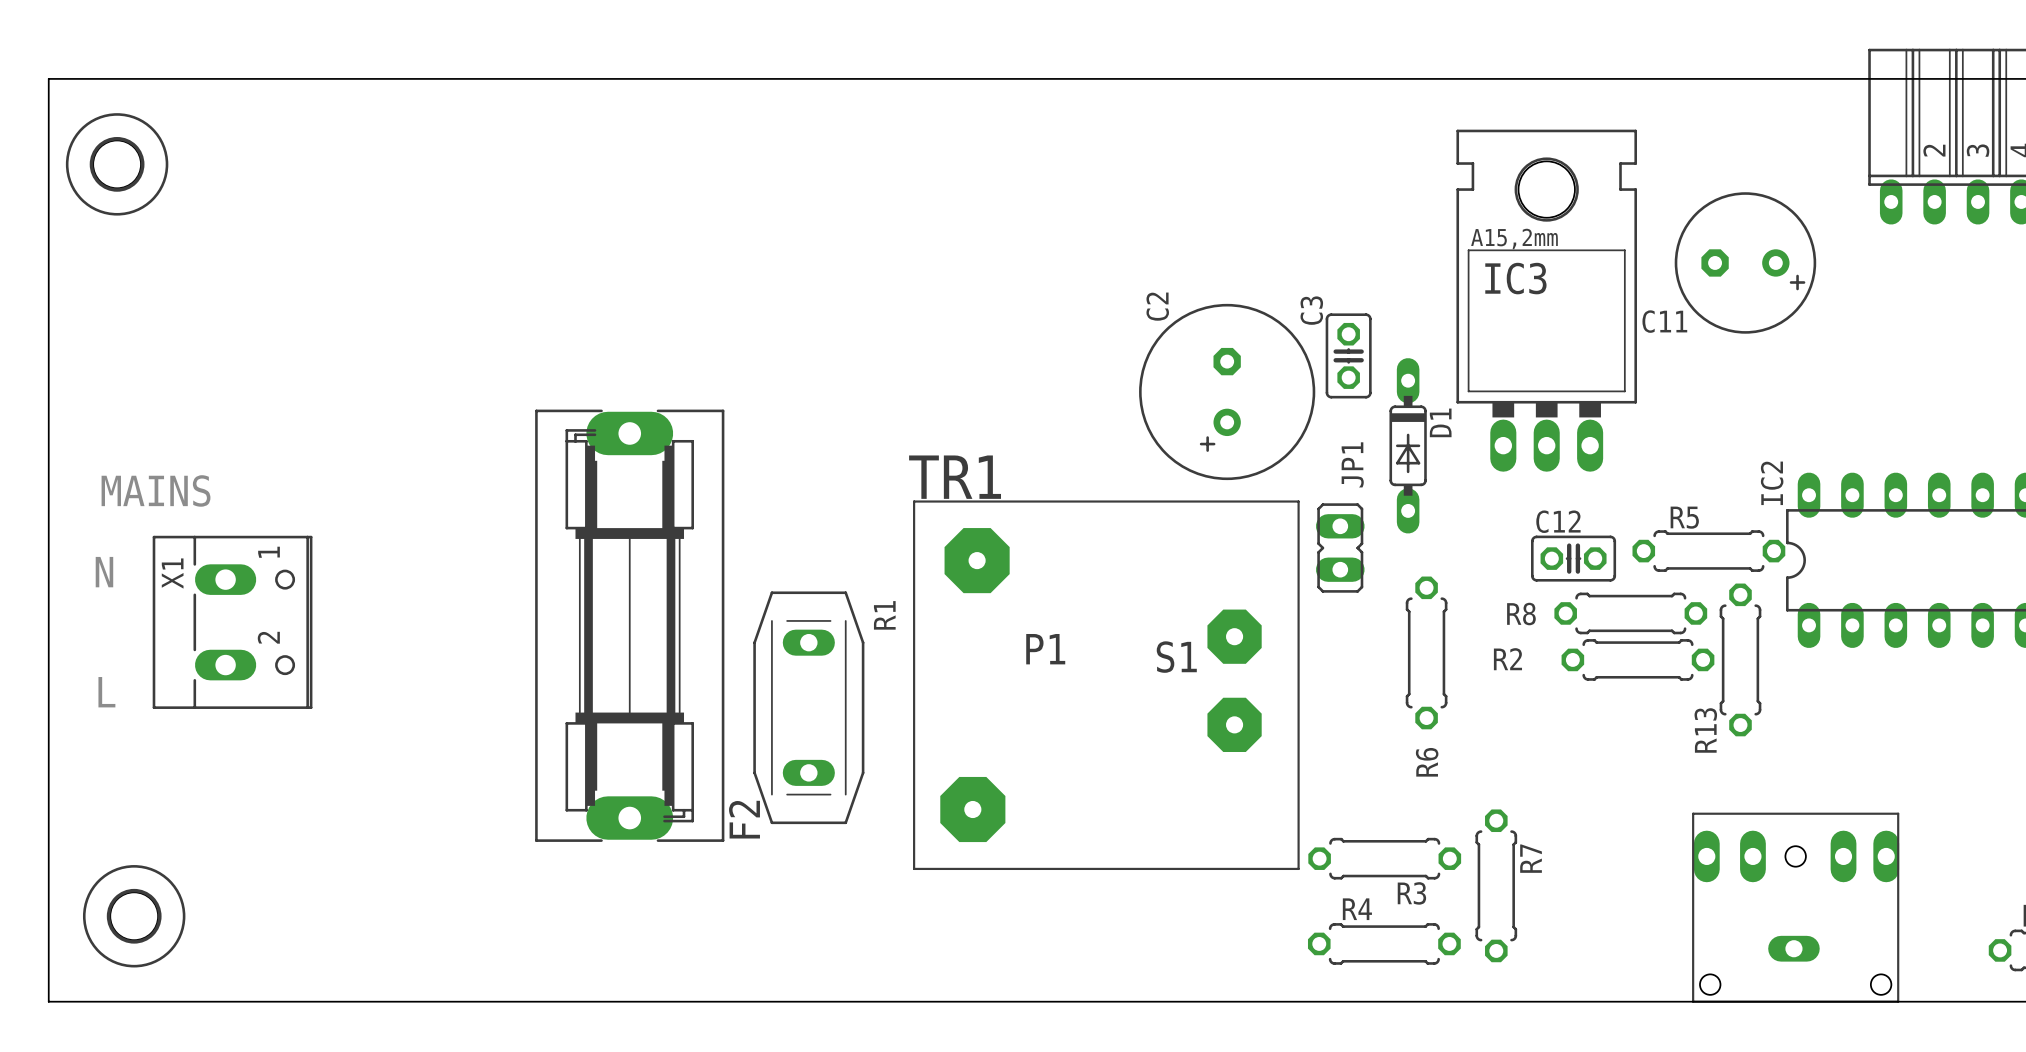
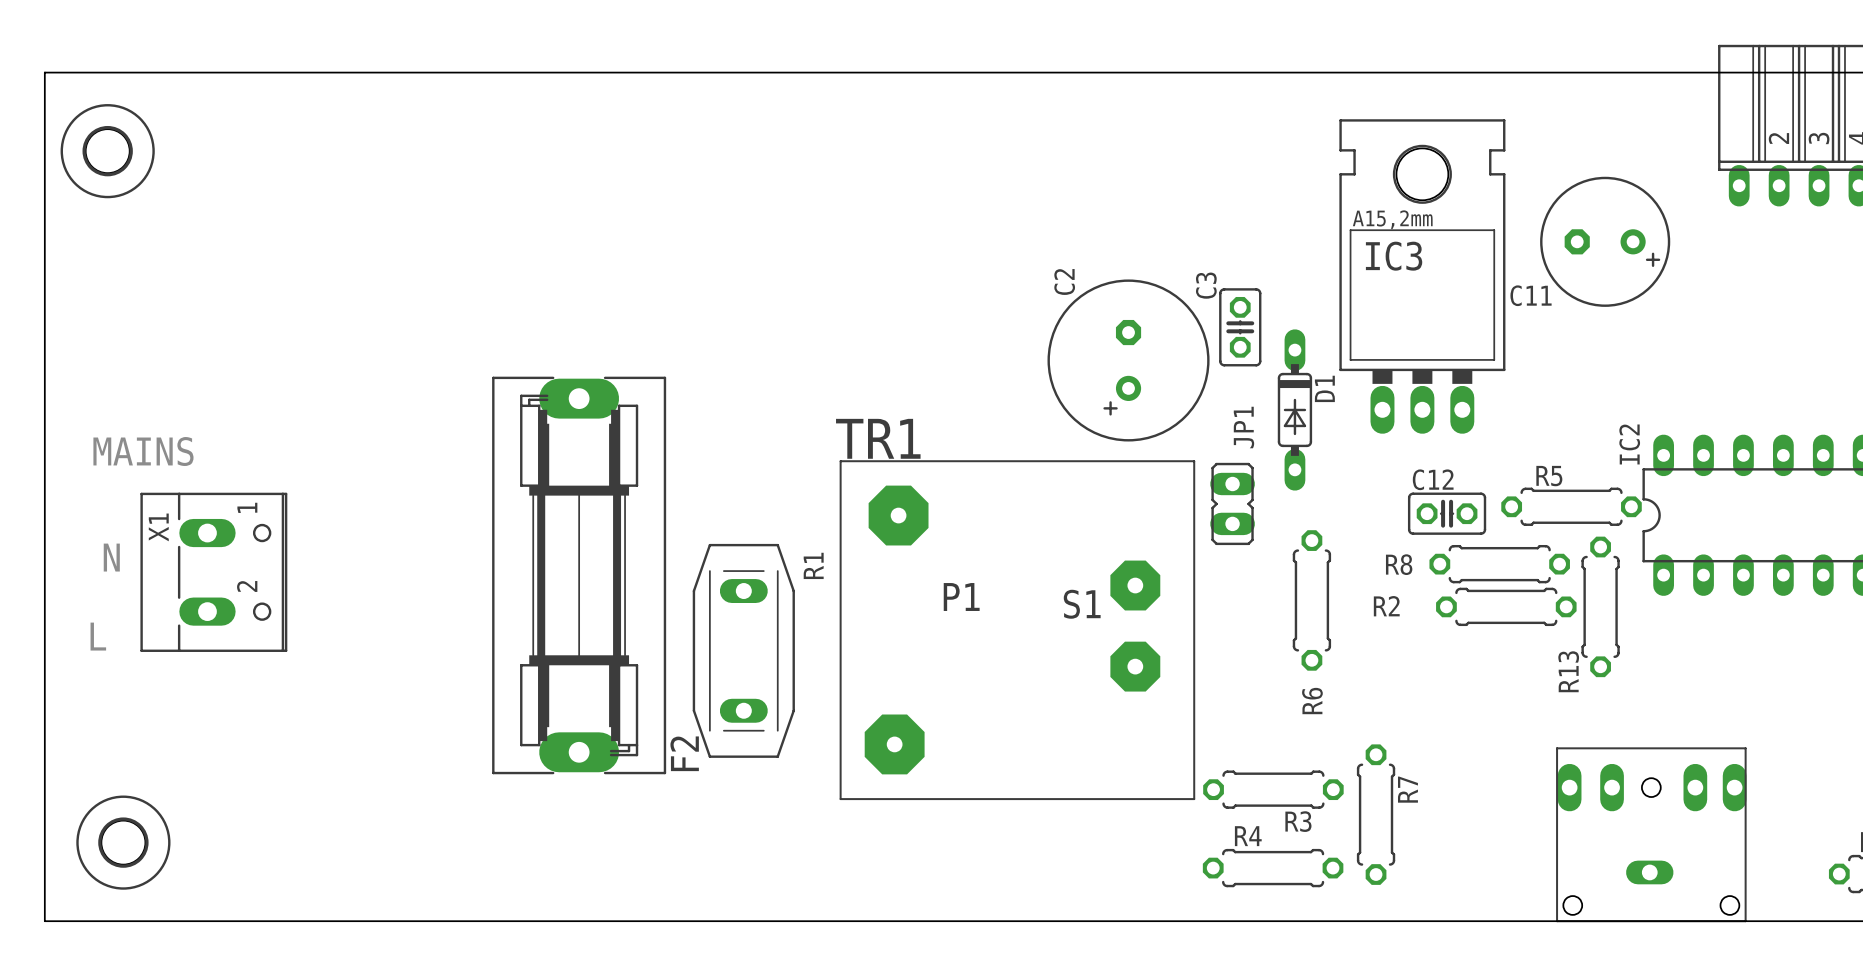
text position: N (104, 572) -> N (111, 557)

